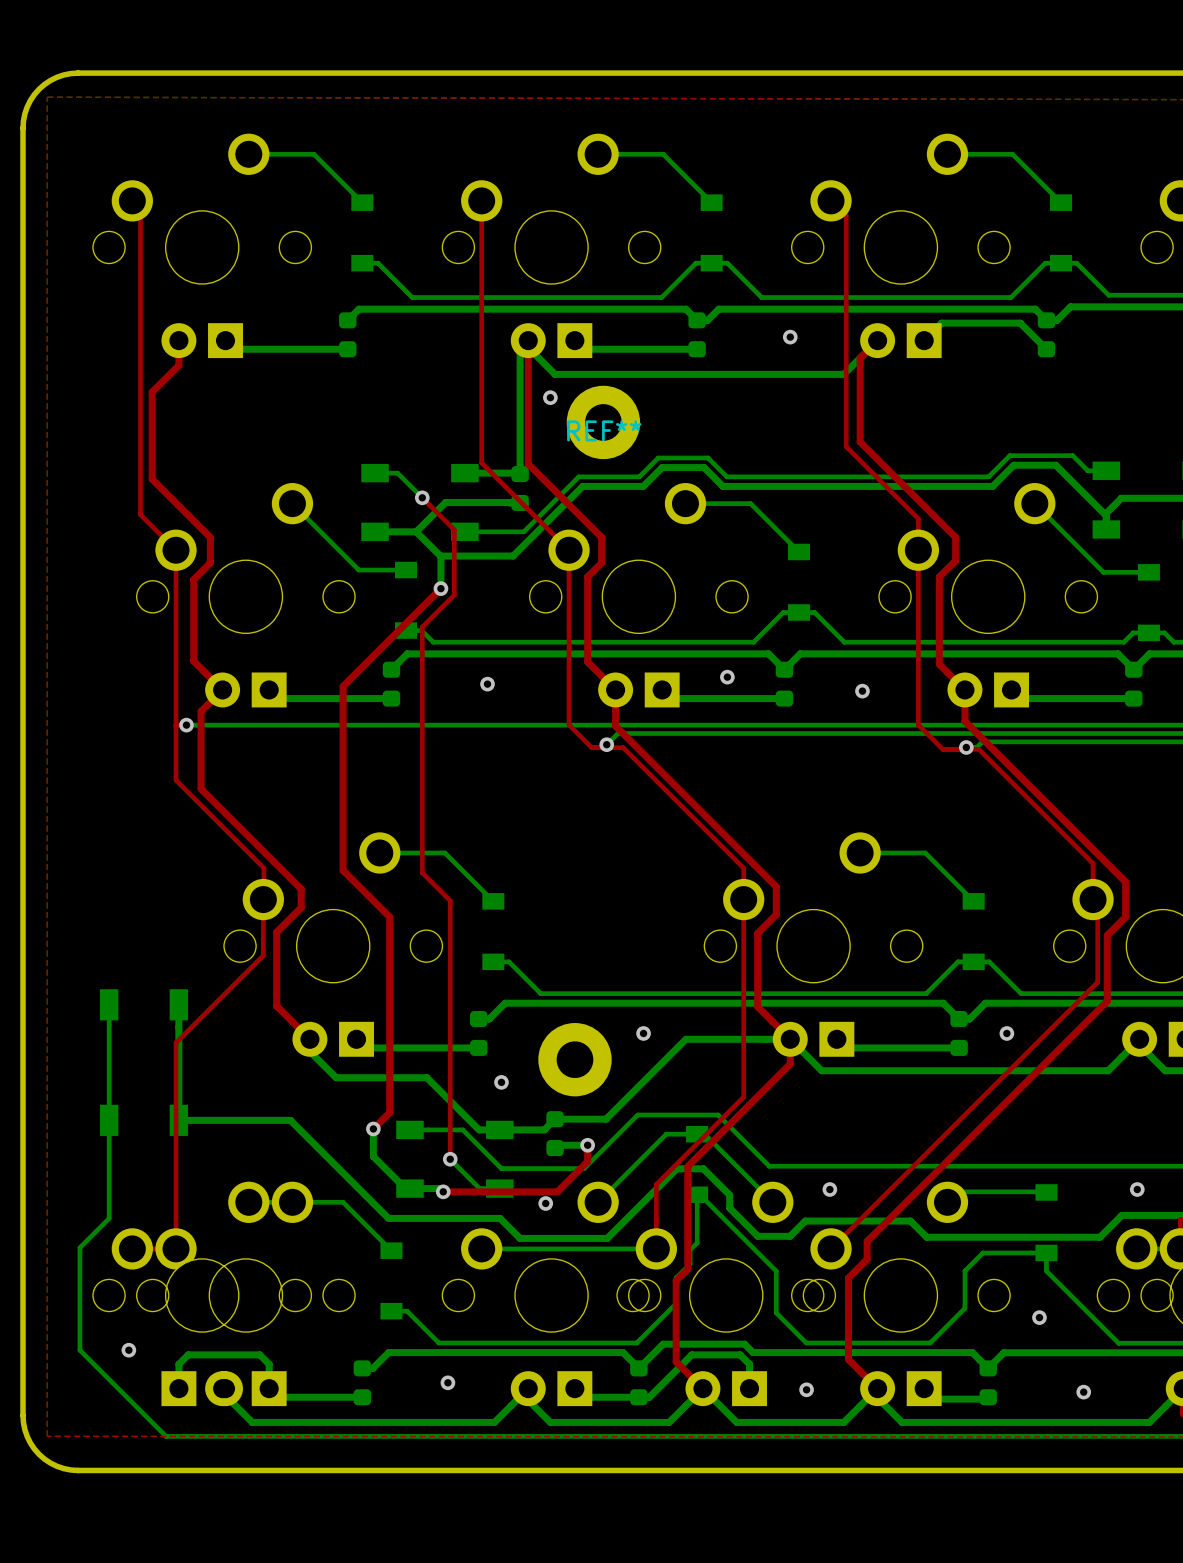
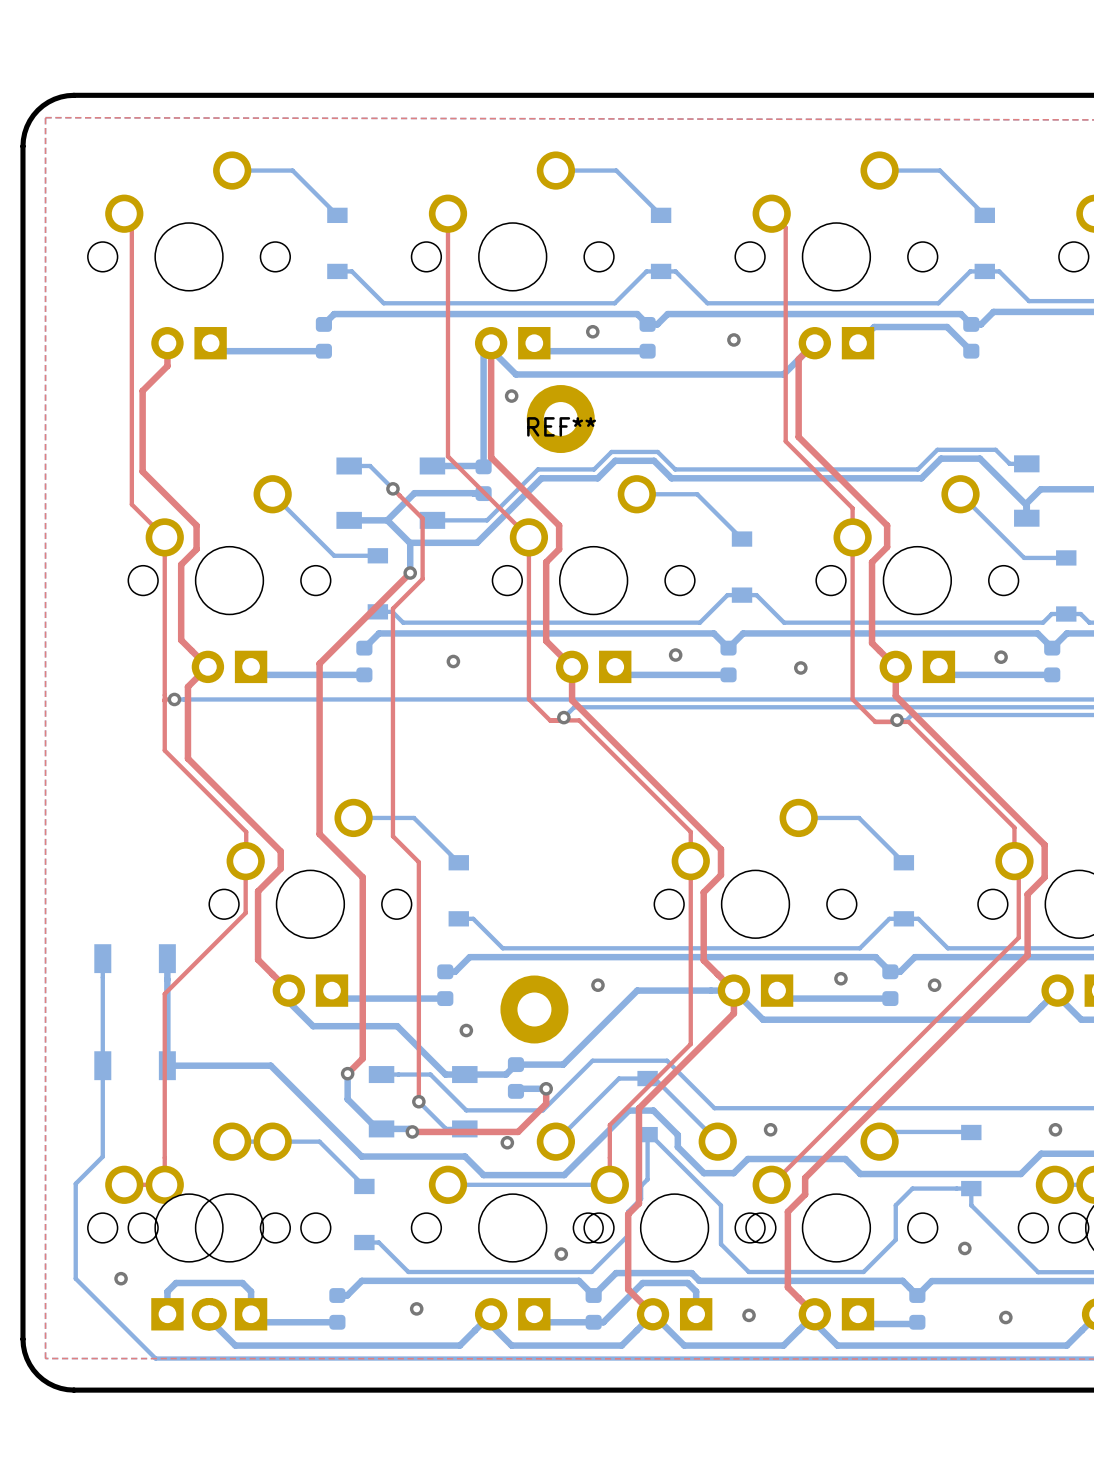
via: none -> (592, 331)
via: none -> (1001, 657)
via: none -> (840, 978)
via: none -> (561, 1254)

